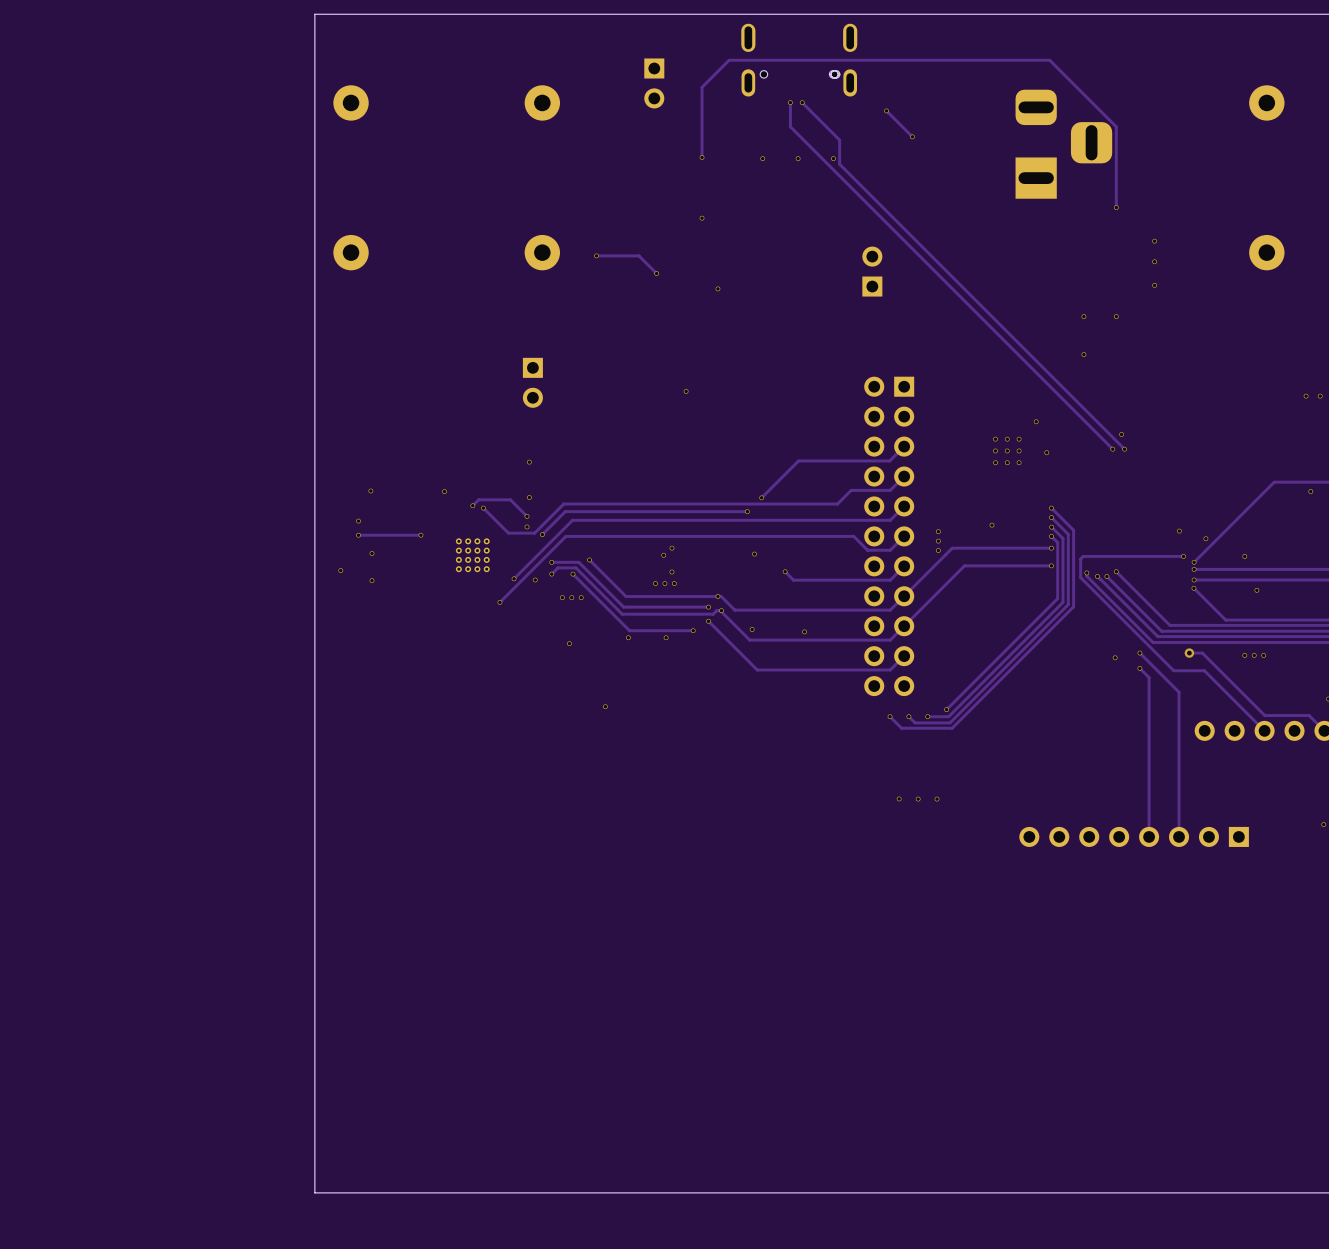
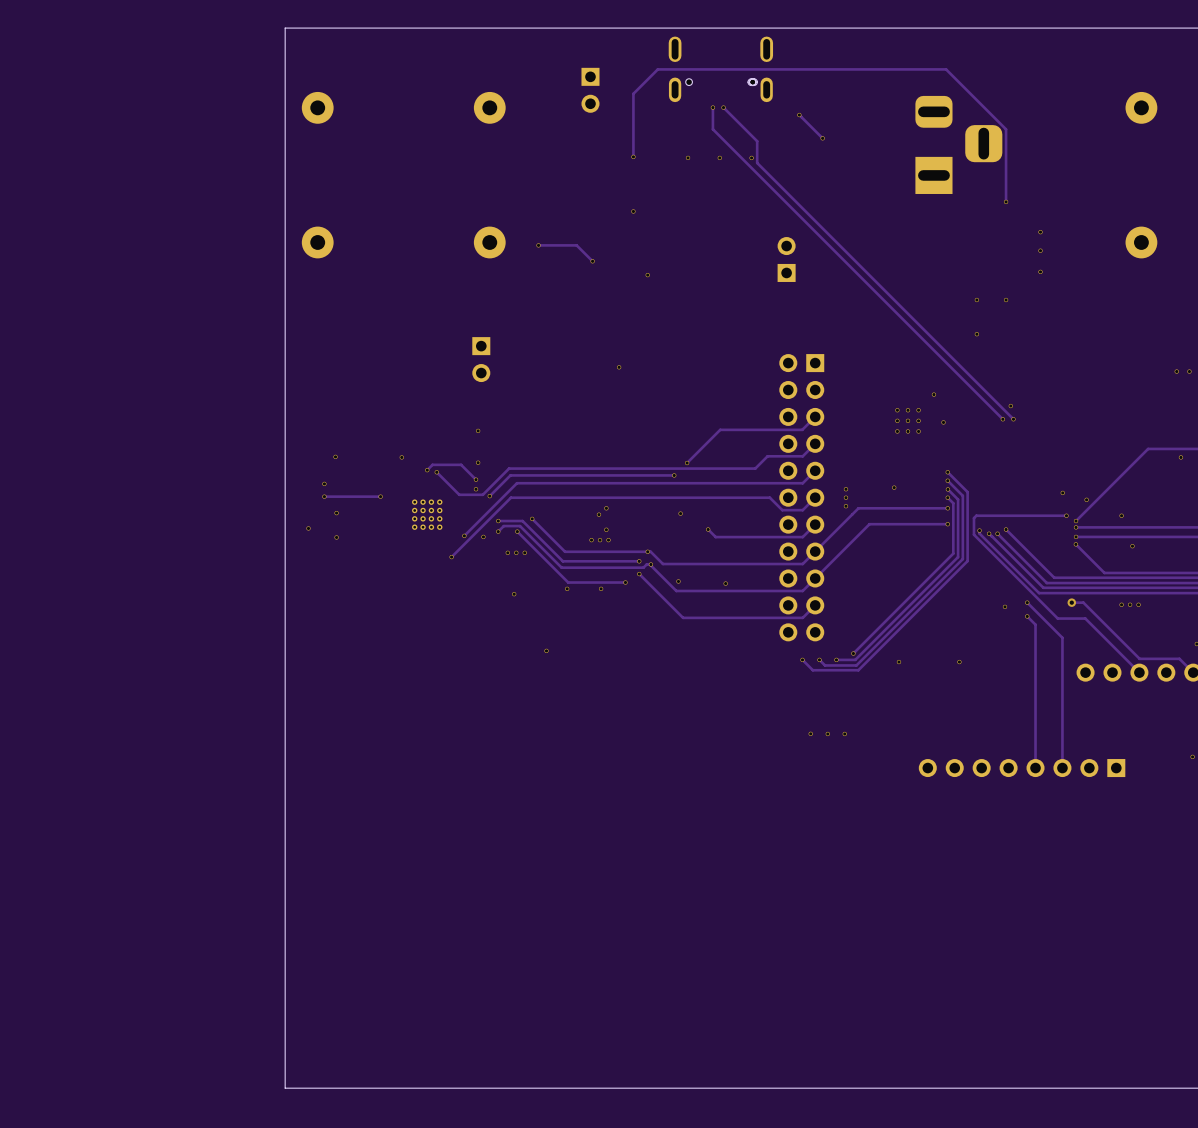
via: none -> (845, 489)
via: (938, 531) -> none
via: none -> (845, 497)
via: (938, 541) -> none
via: none -> (845, 506)
via: (938, 550) -> none
via: none -> (898, 662)
via: none -> (959, 662)

